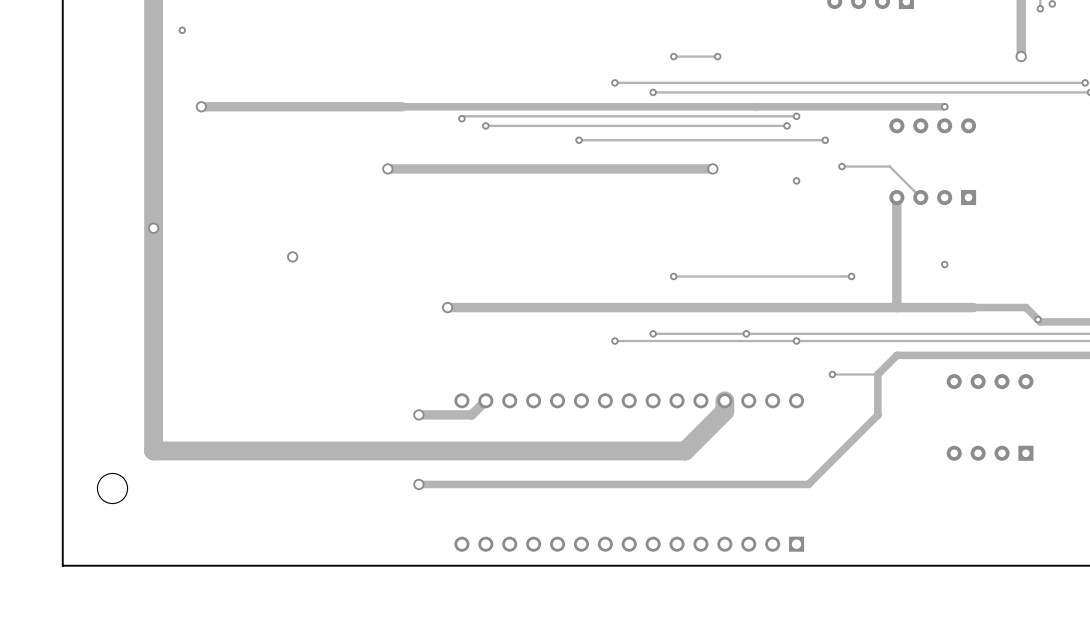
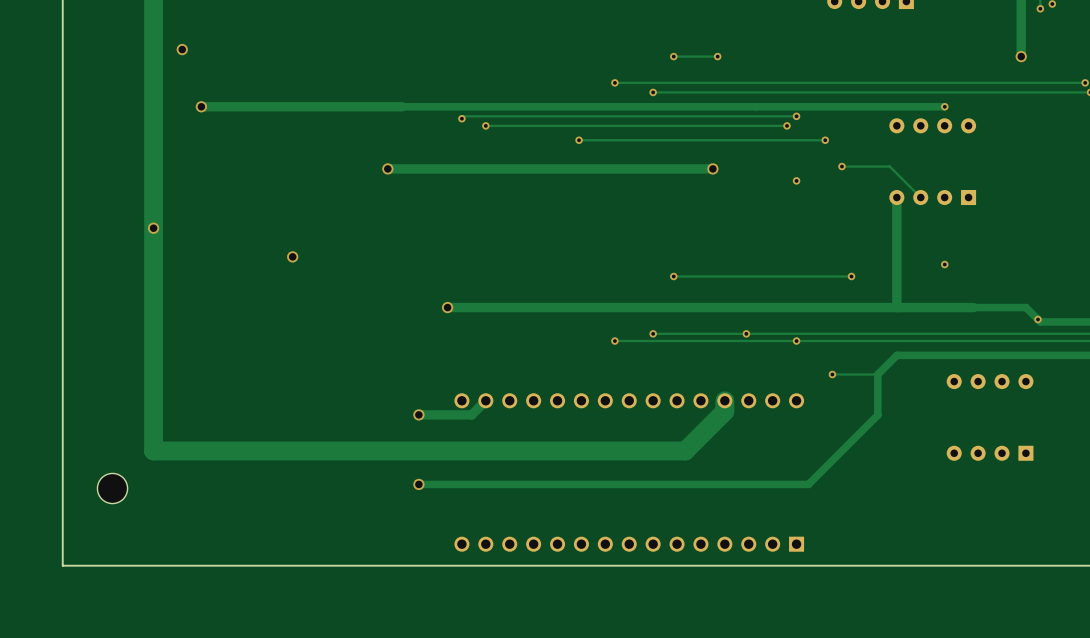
via: (182, 30) -> none
via: none -> (182, 49)

